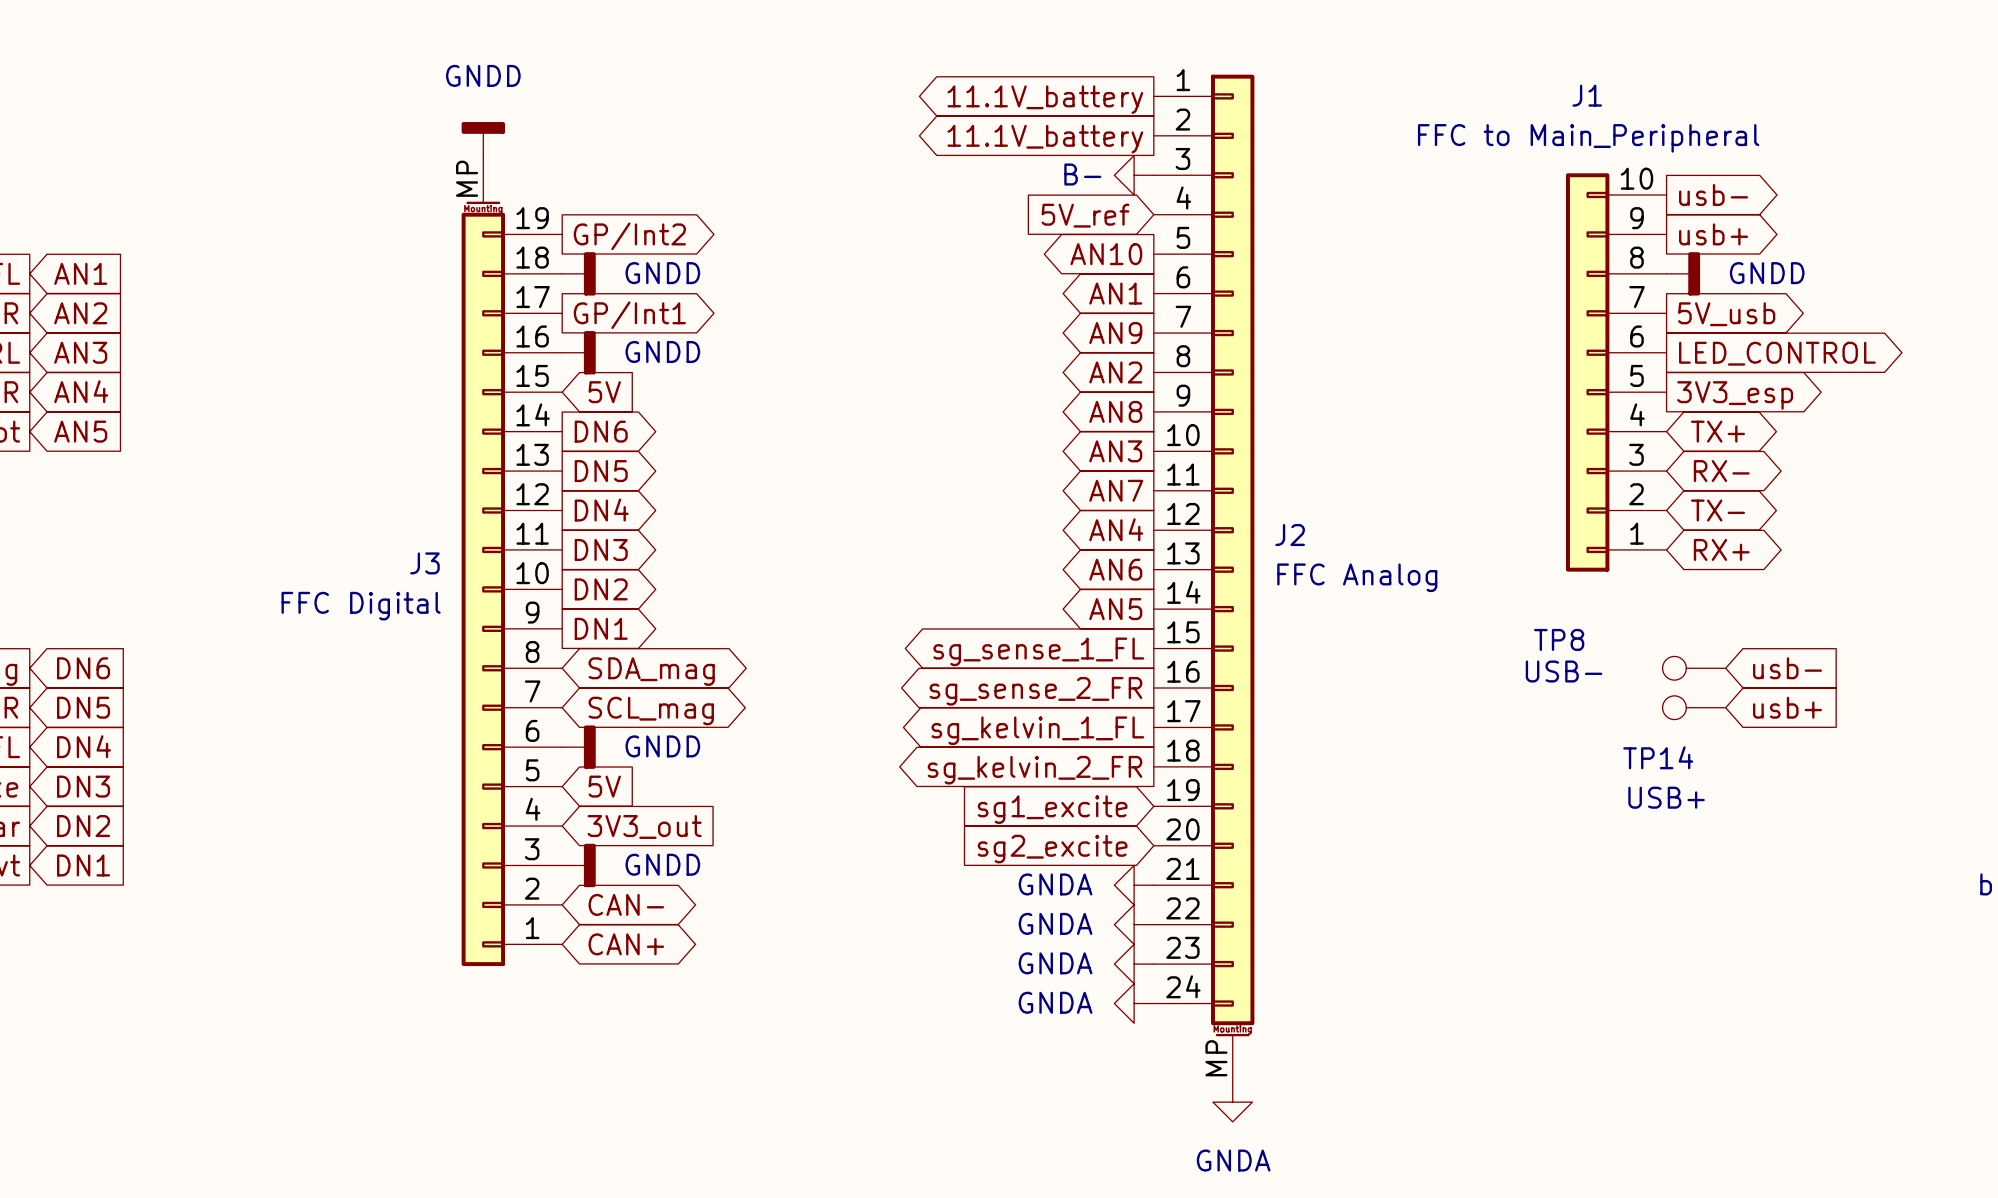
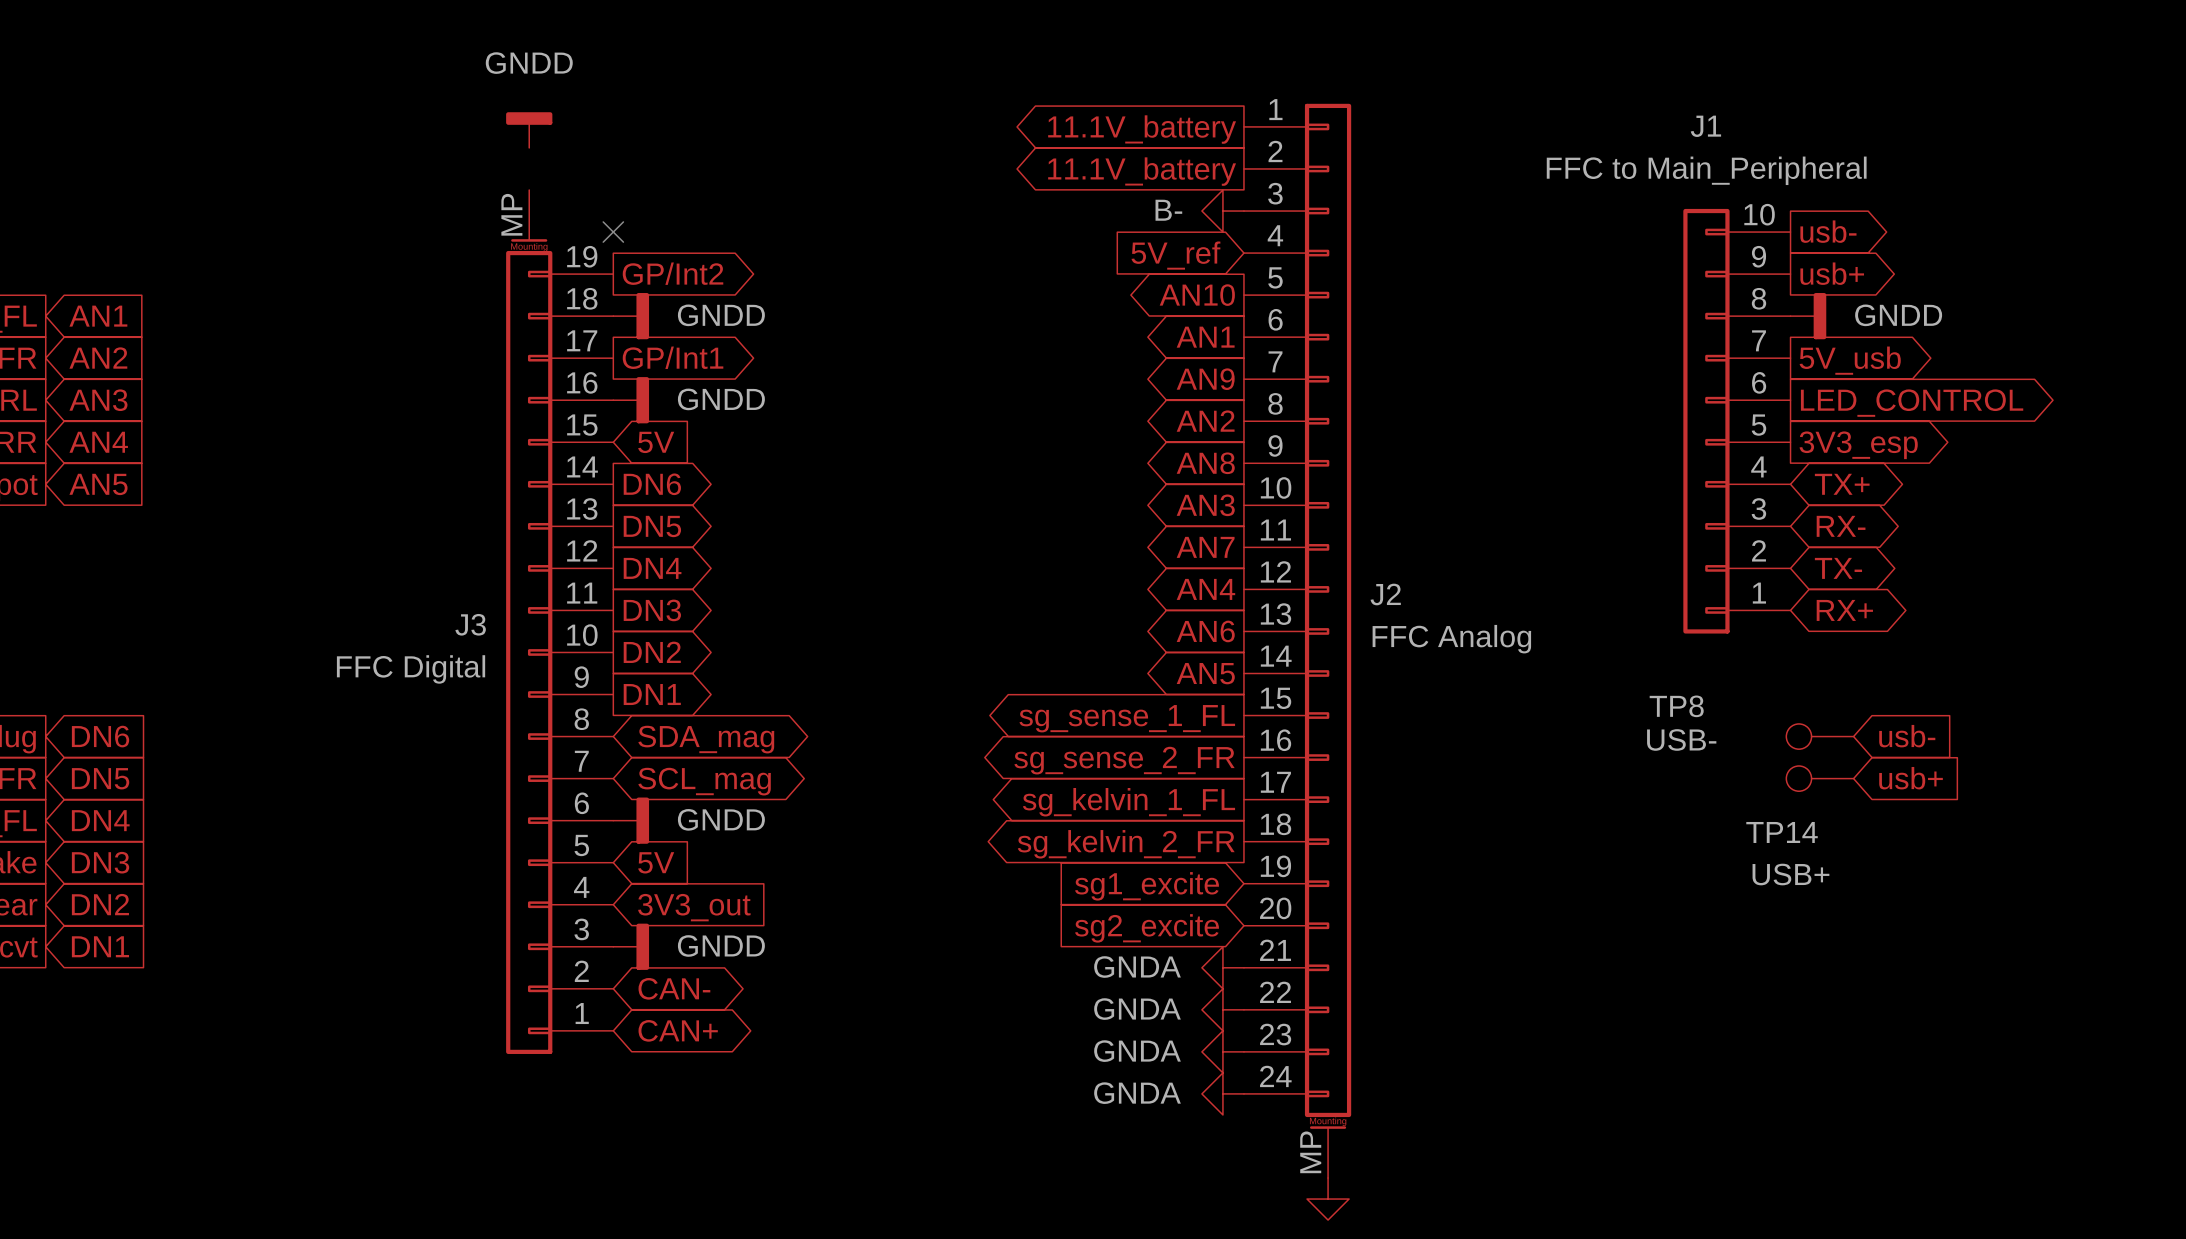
power symbol position: GNDD (483, 138) -> GNDD (529, 130)
no-connect mark: none -> (613, 232)

